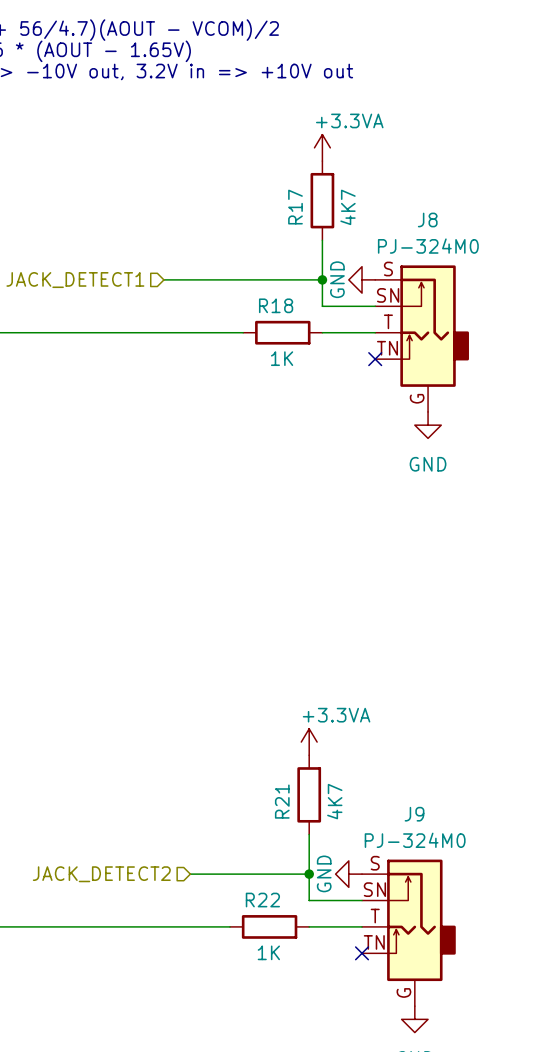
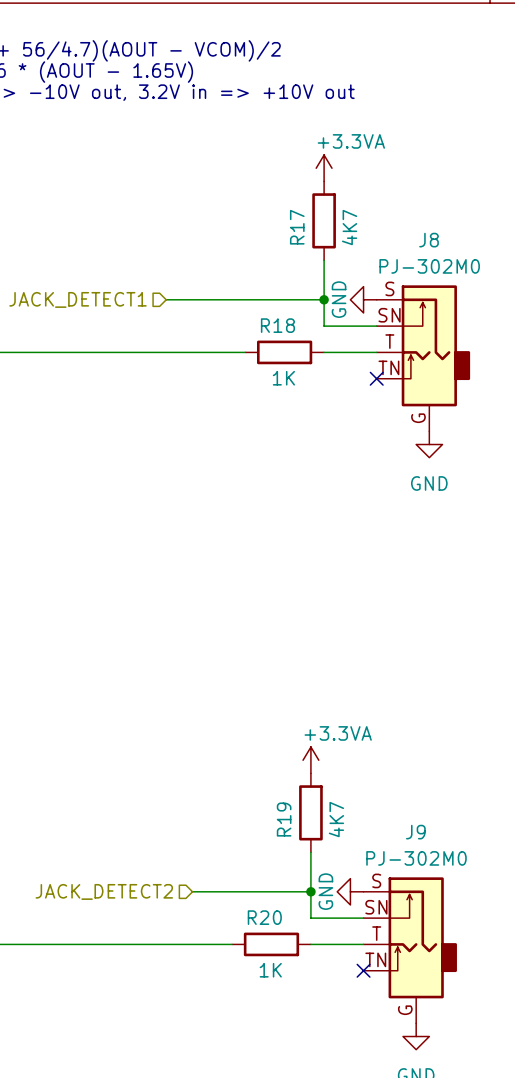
J8 value: PJ-324M0 (428, 246) -> PJ-302M0 (429, 266)
R21 name: R21 (282, 801) -> R19 (284, 819)
J9 value: PJ-324M0 (415, 840) -> PJ-302M0 (416, 858)
R22 name: R22 (262, 900) -> R20 (264, 917)

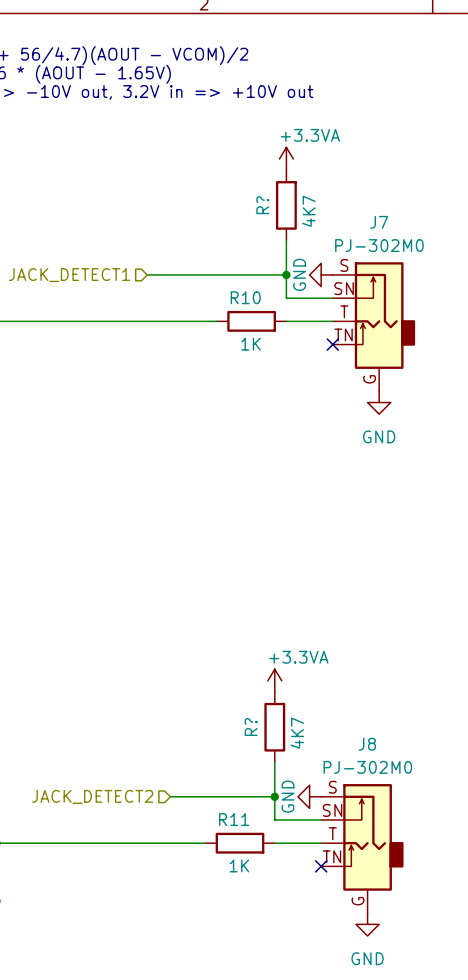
R17 name: R17 (297, 227) -> R? (262, 205)
J8 name: J8 (429, 240) -> J7 (379, 222)
R18 name: R18 (277, 325) -> R10 (245, 297)
R19 name: R19 (284, 819) -> R? (251, 727)
J9 name: J9 (415, 832) -> J8 (367, 744)
R20 name: R20 (264, 917) -> R11 (234, 819)

